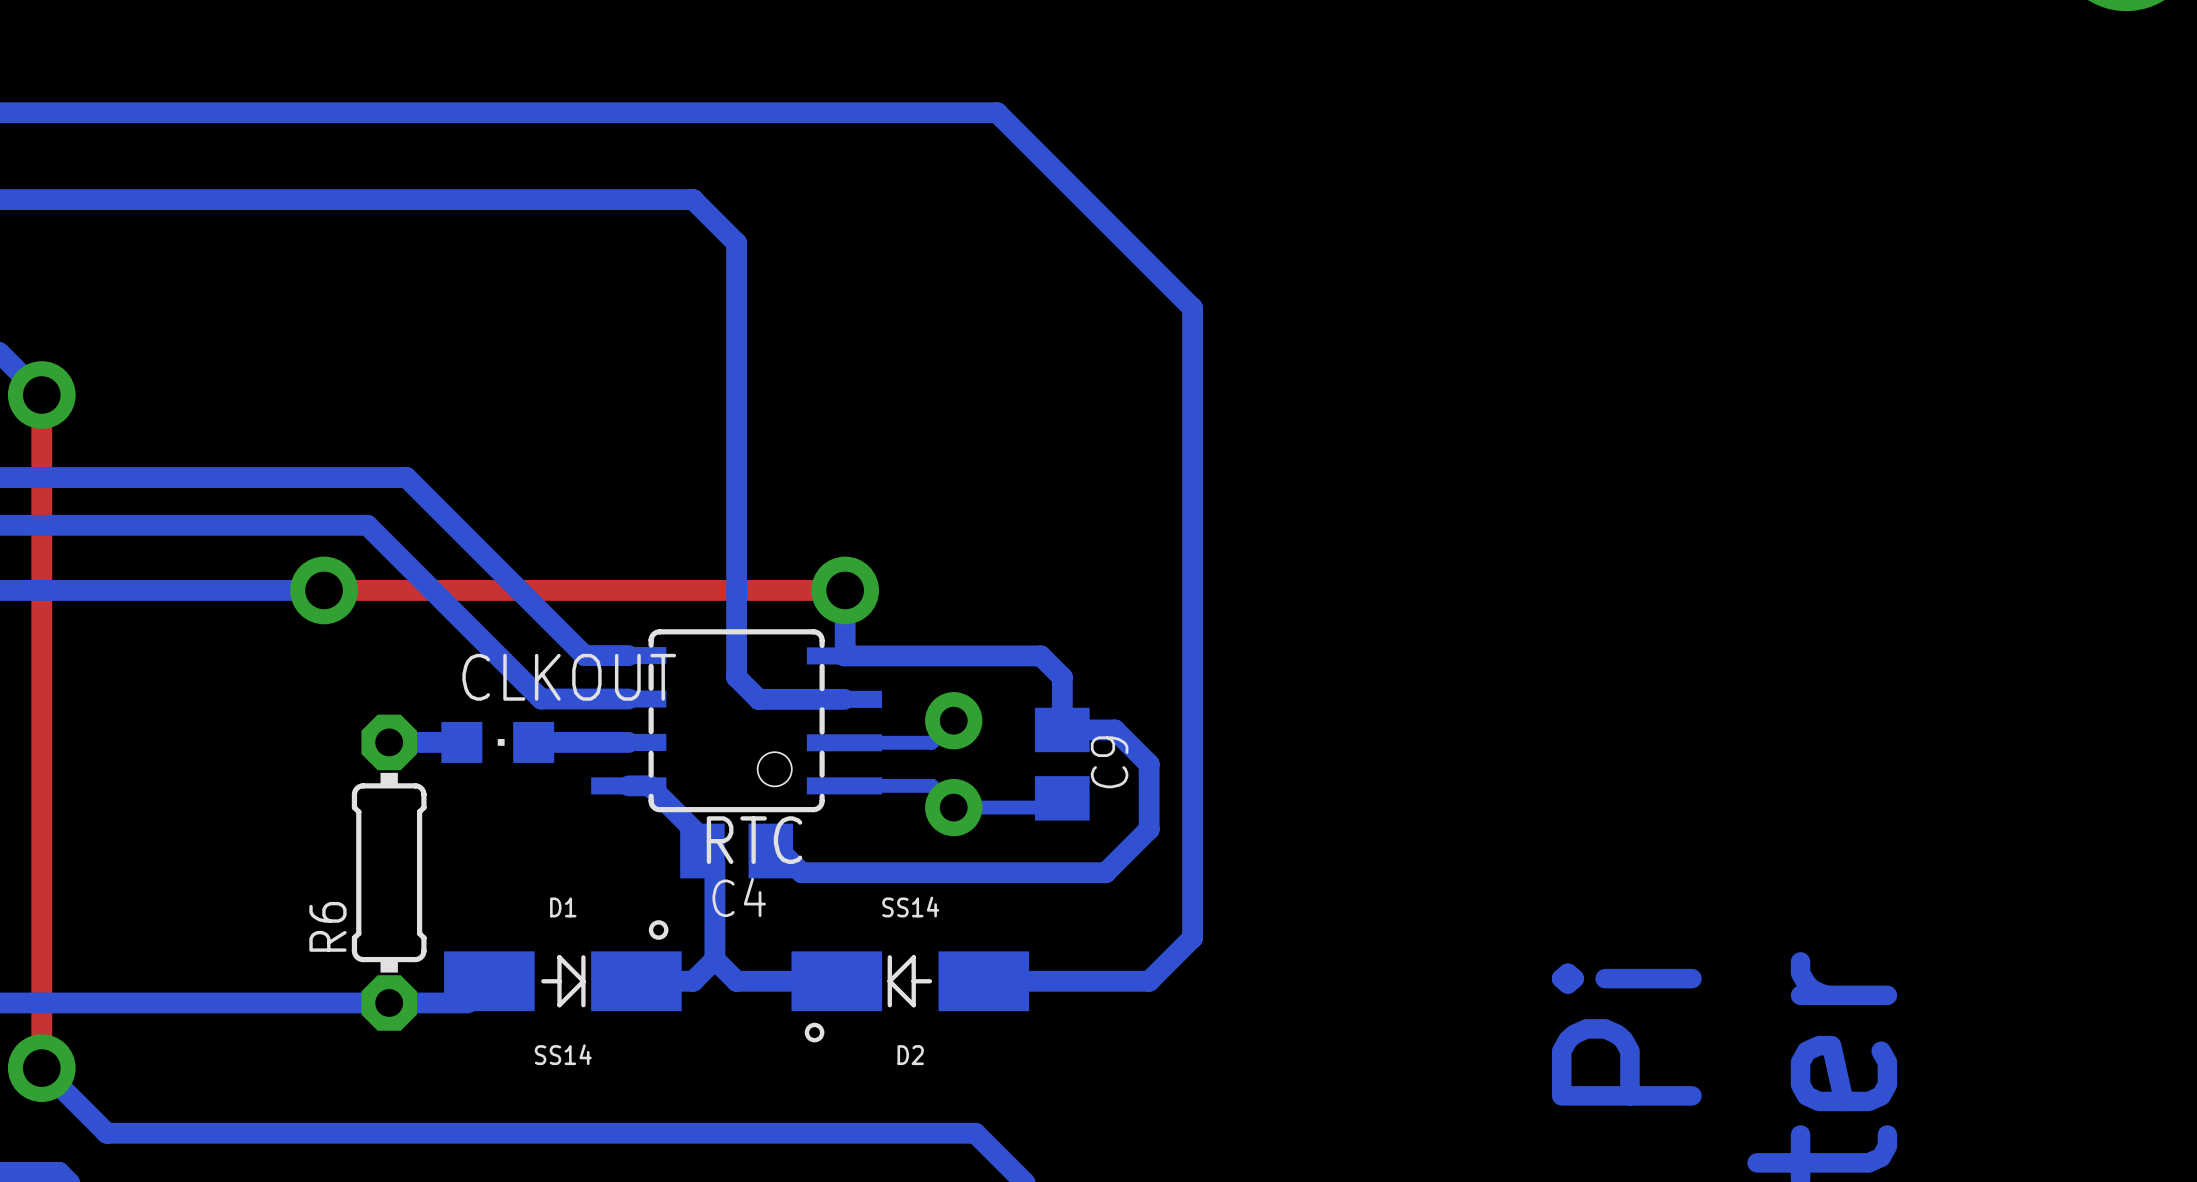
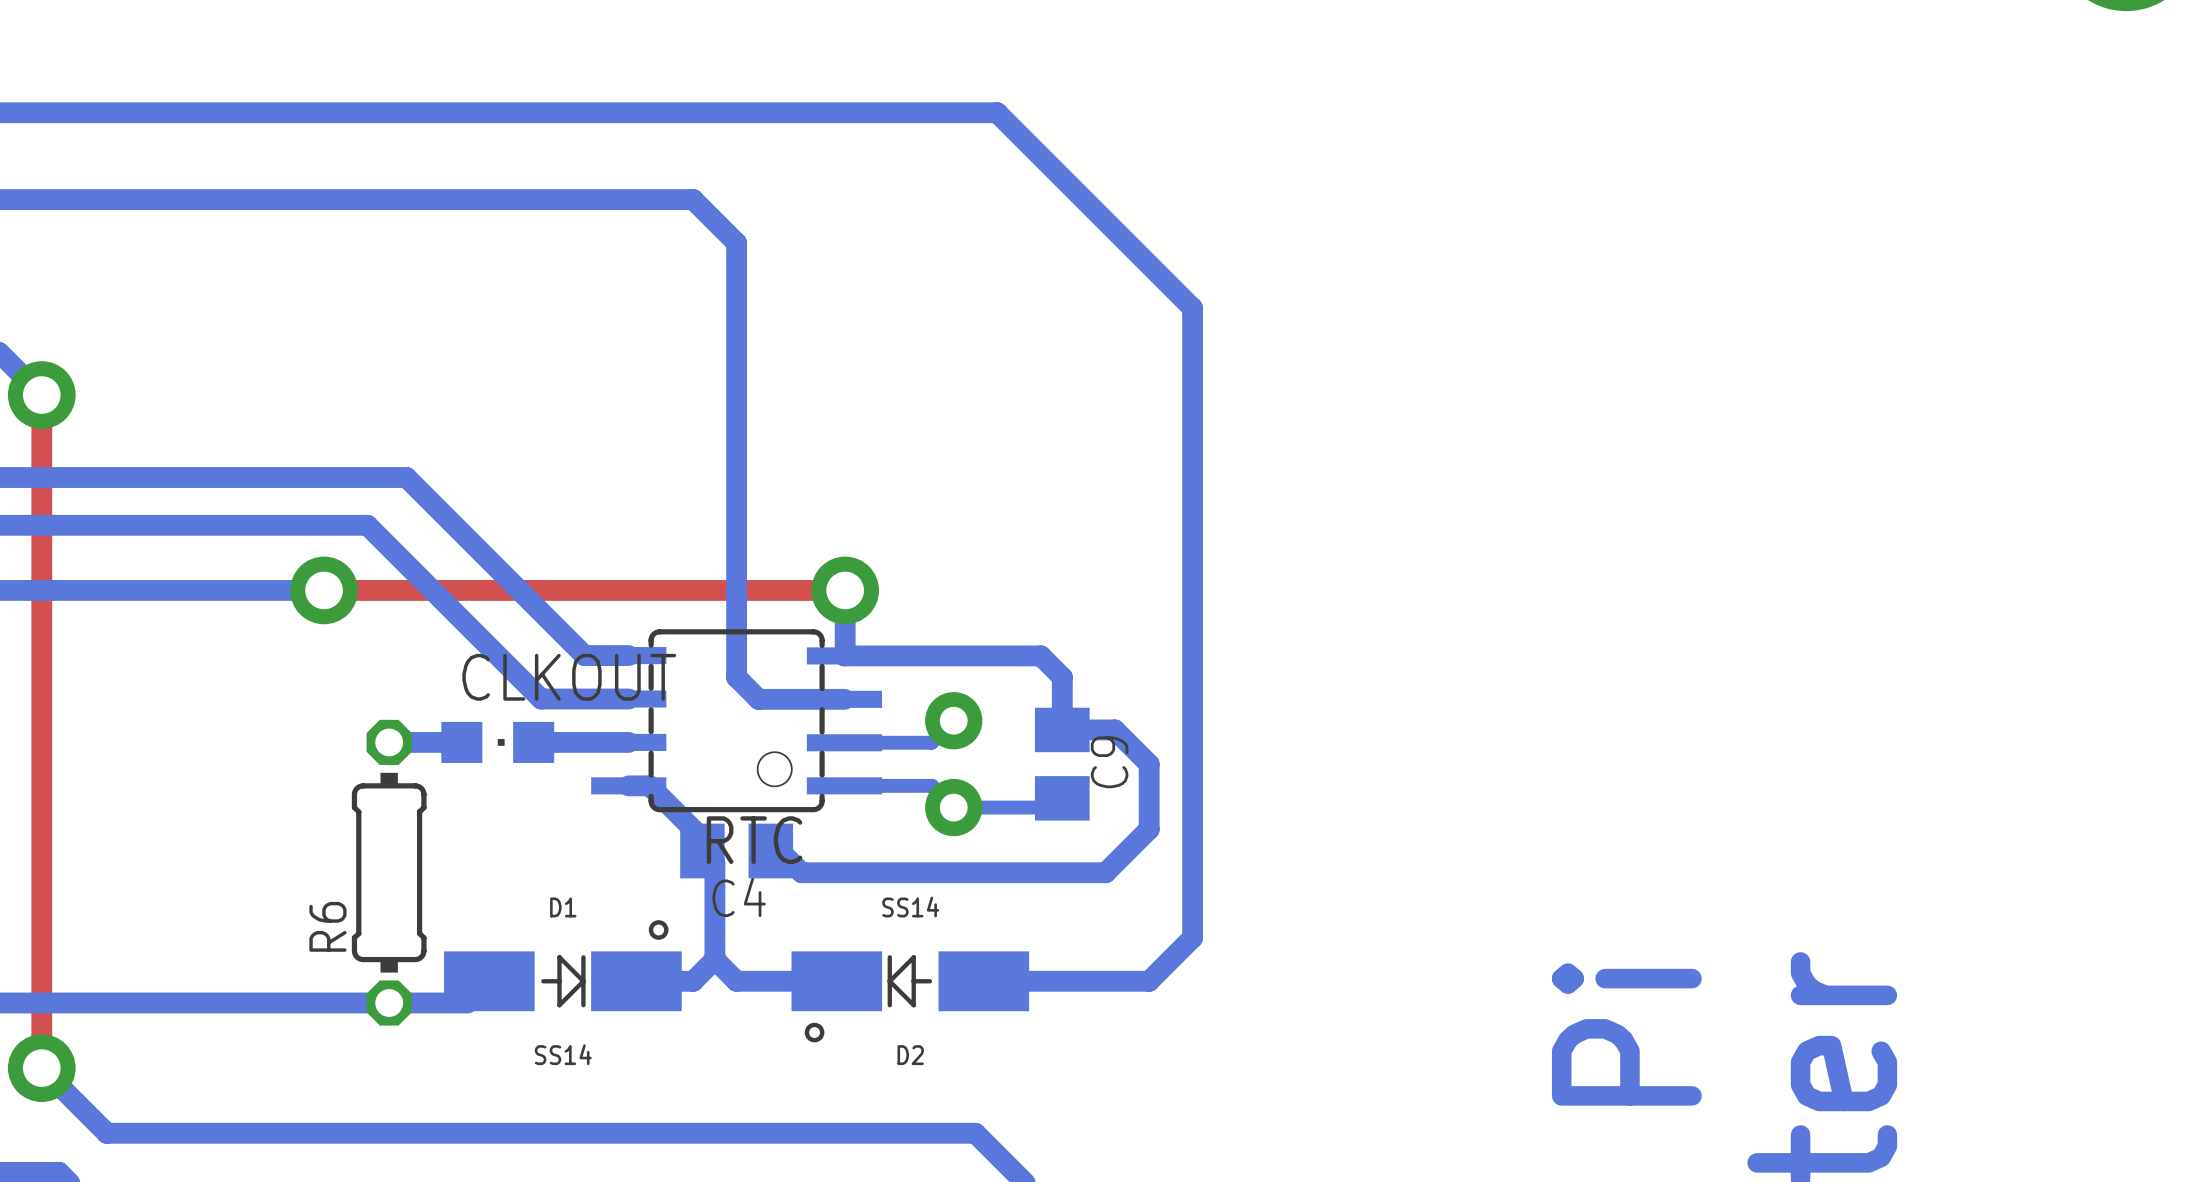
R6 footprint: [351, 714, 427, 1031] -> [351, 719, 427, 1026]

